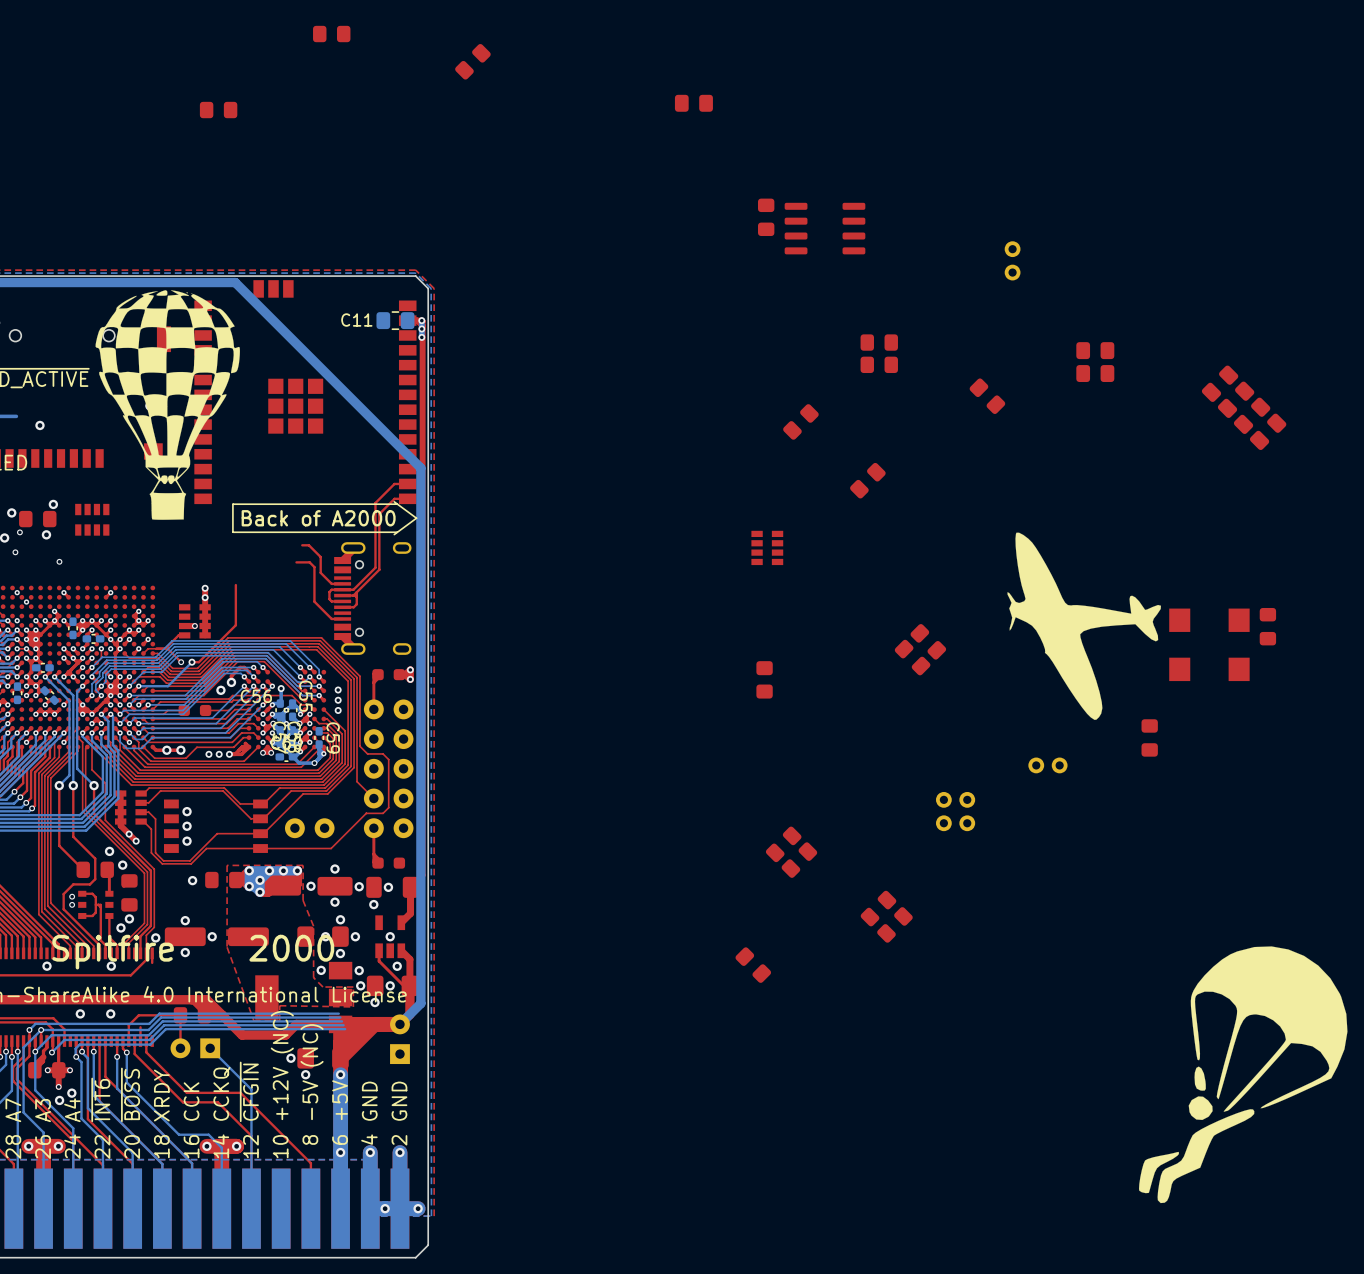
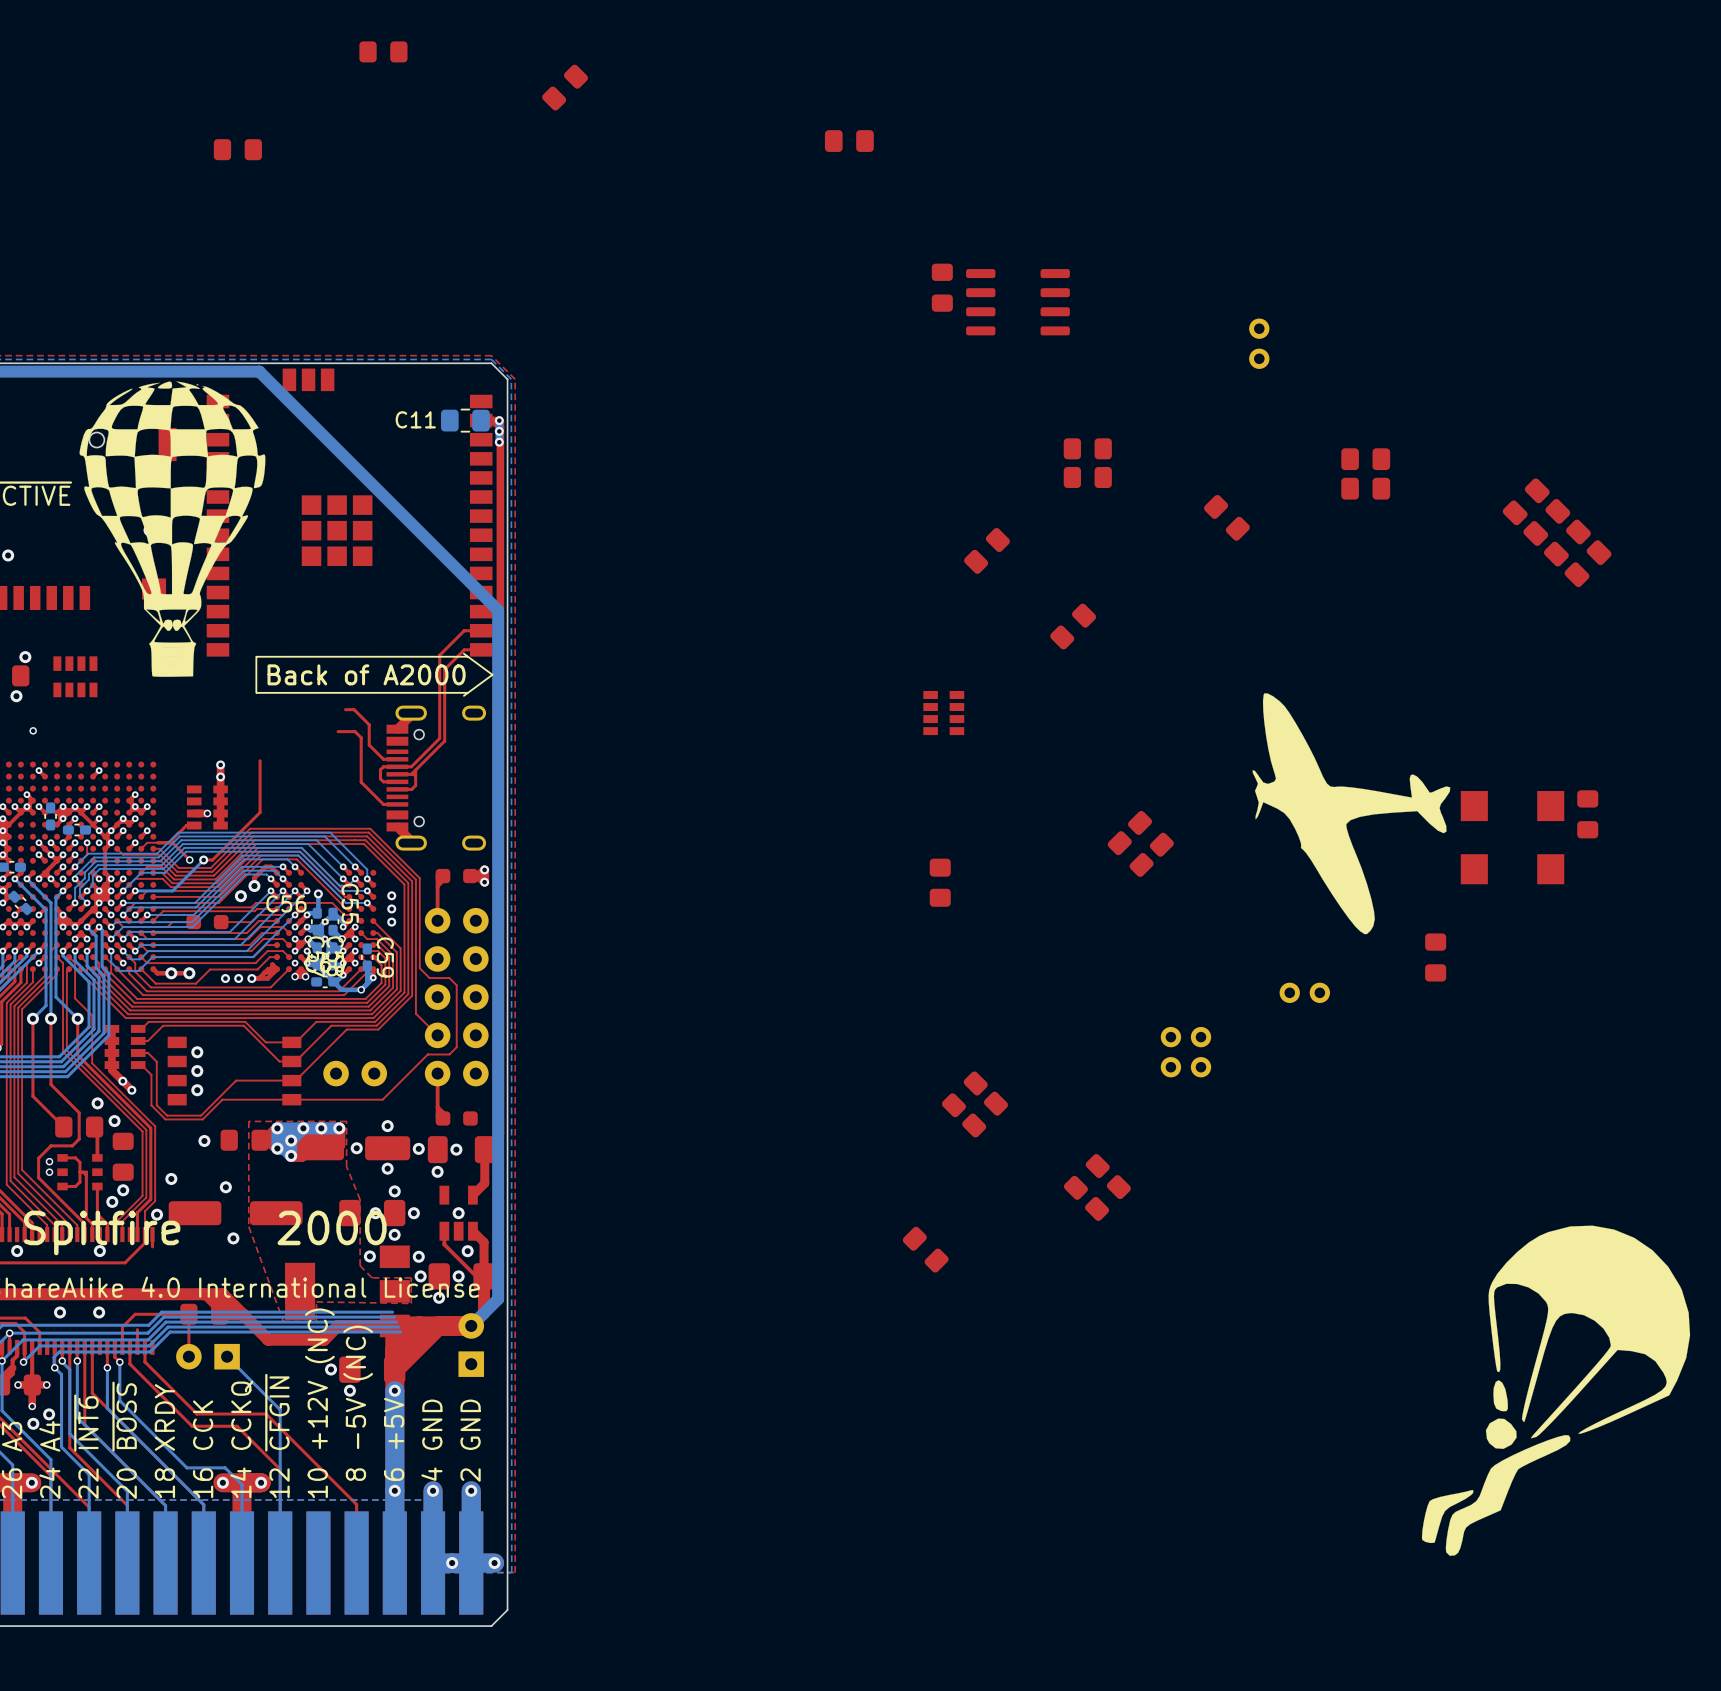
via: none -> (171, 1178)
via: none -> (225, 1187)
via: (185, 920) -> none
via: (212, 936) -> none
via: (185, 952) -> none
via: none -> (233, 1238)

